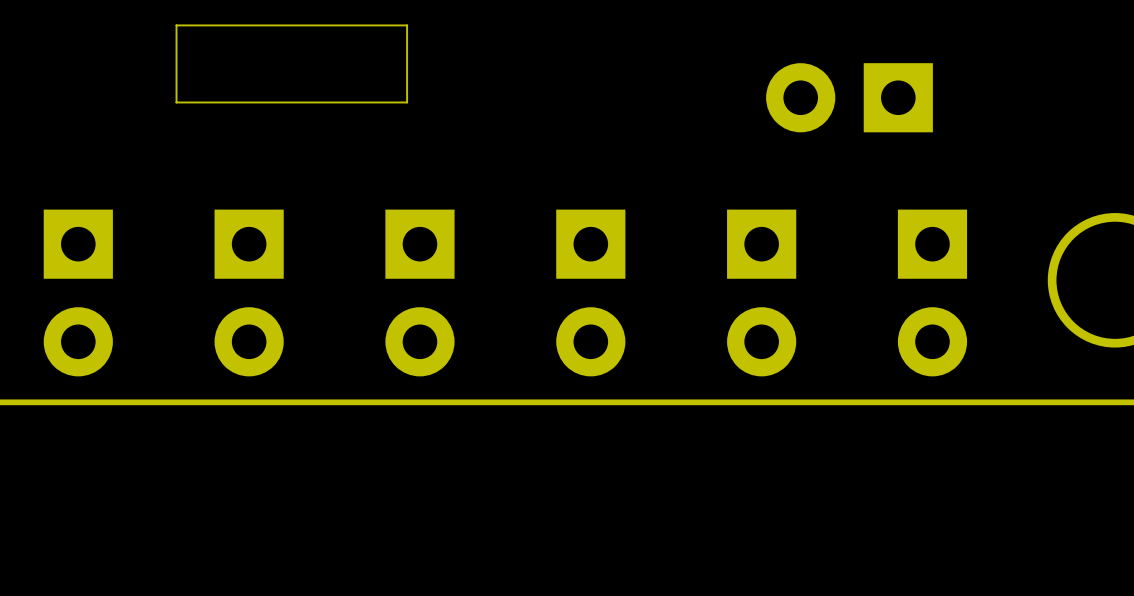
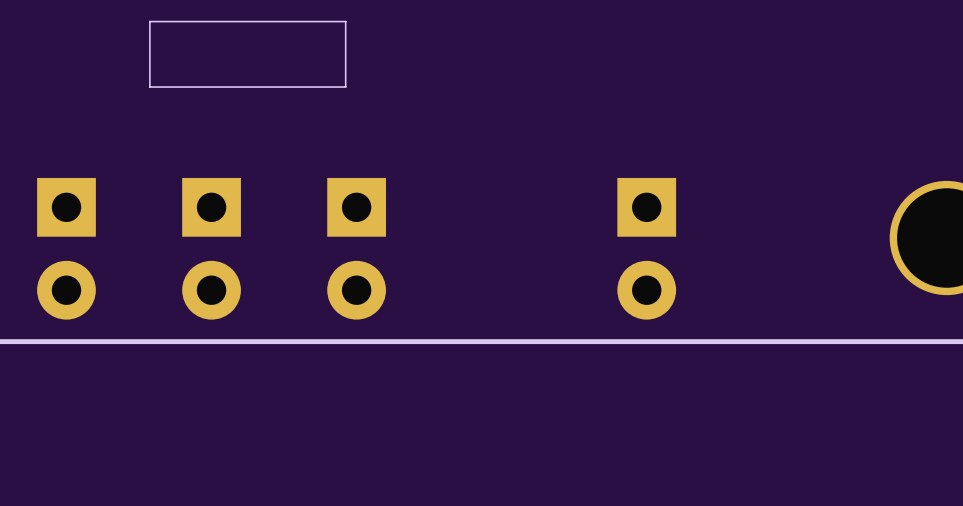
part: (849, 97) -> none
part: (590, 292) -> none
part: (932, 292) -> none

